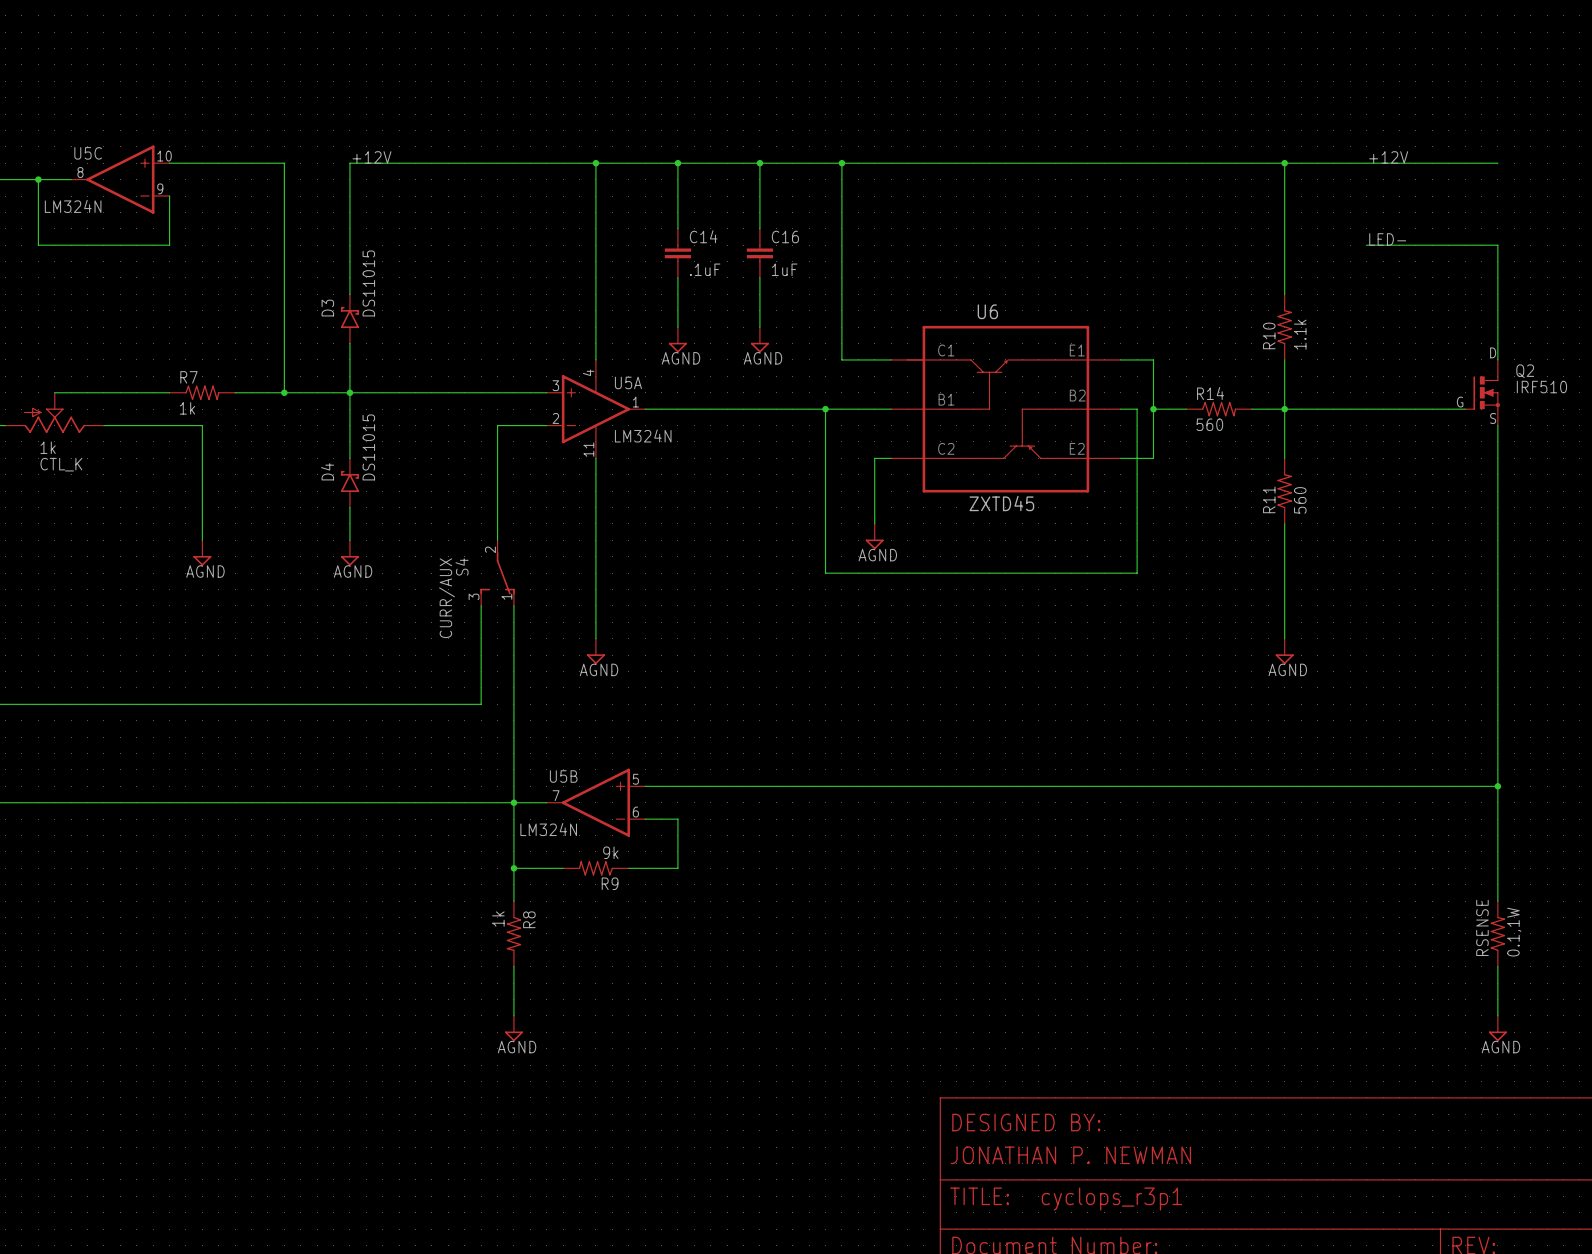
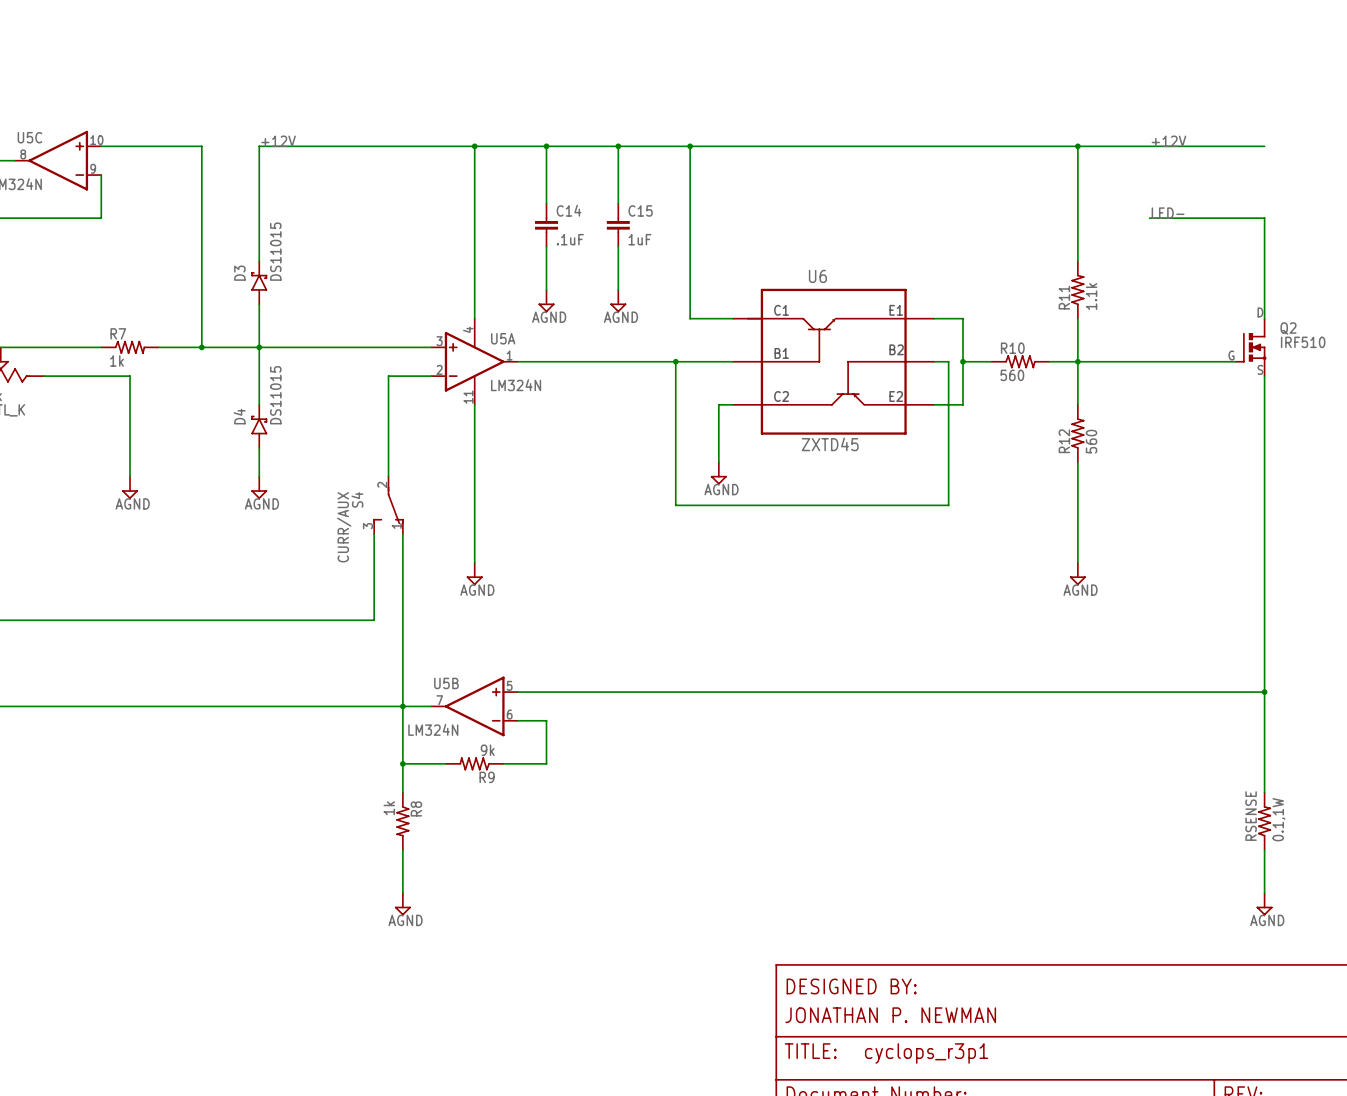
C16 name: C16 (785, 236) -> C15 (640, 210)
R10 name: R10 (1269, 335) -> R11 (1064, 297)
R14 name: R14 (1210, 393) -> R10 (1012, 348)
R11 name: R11 (1269, 499) -> R12 (1064, 441)

